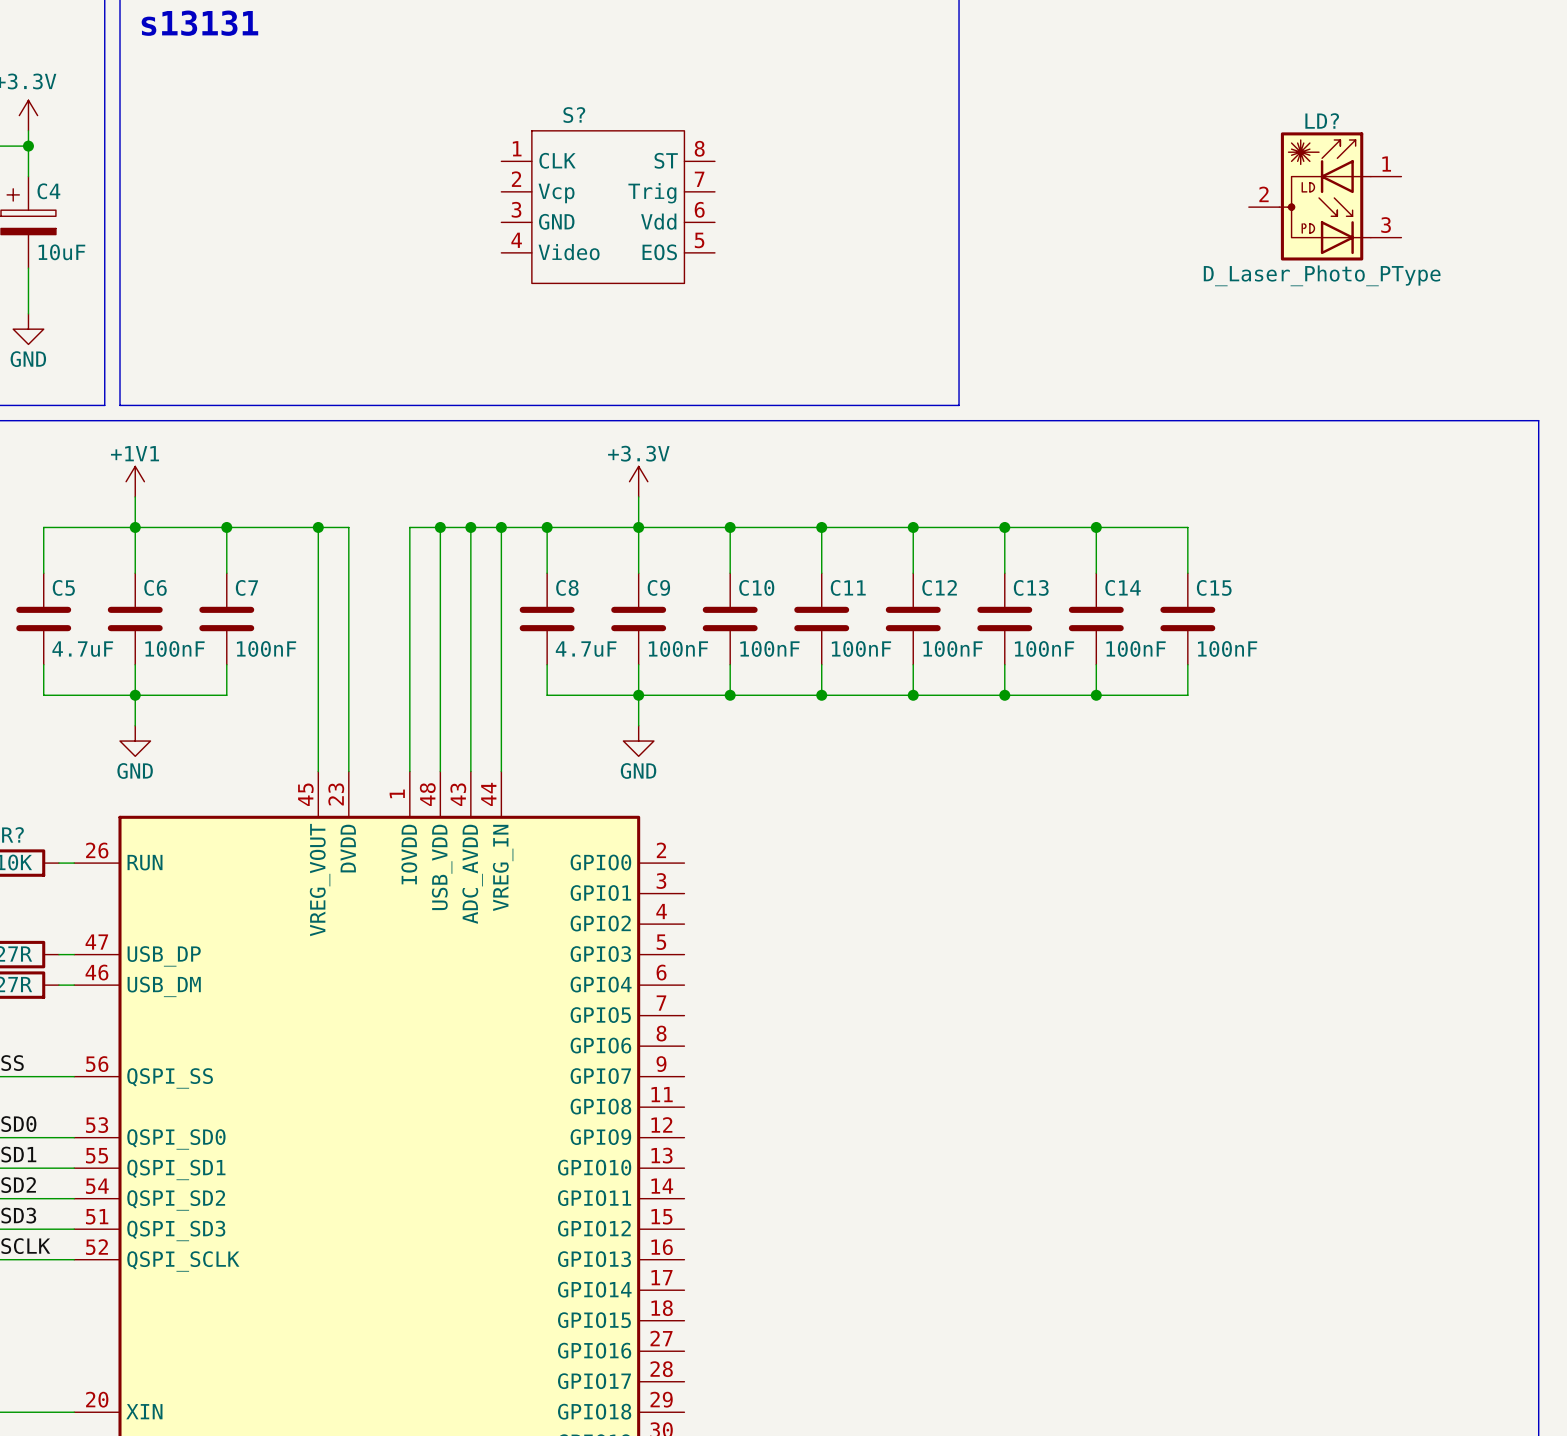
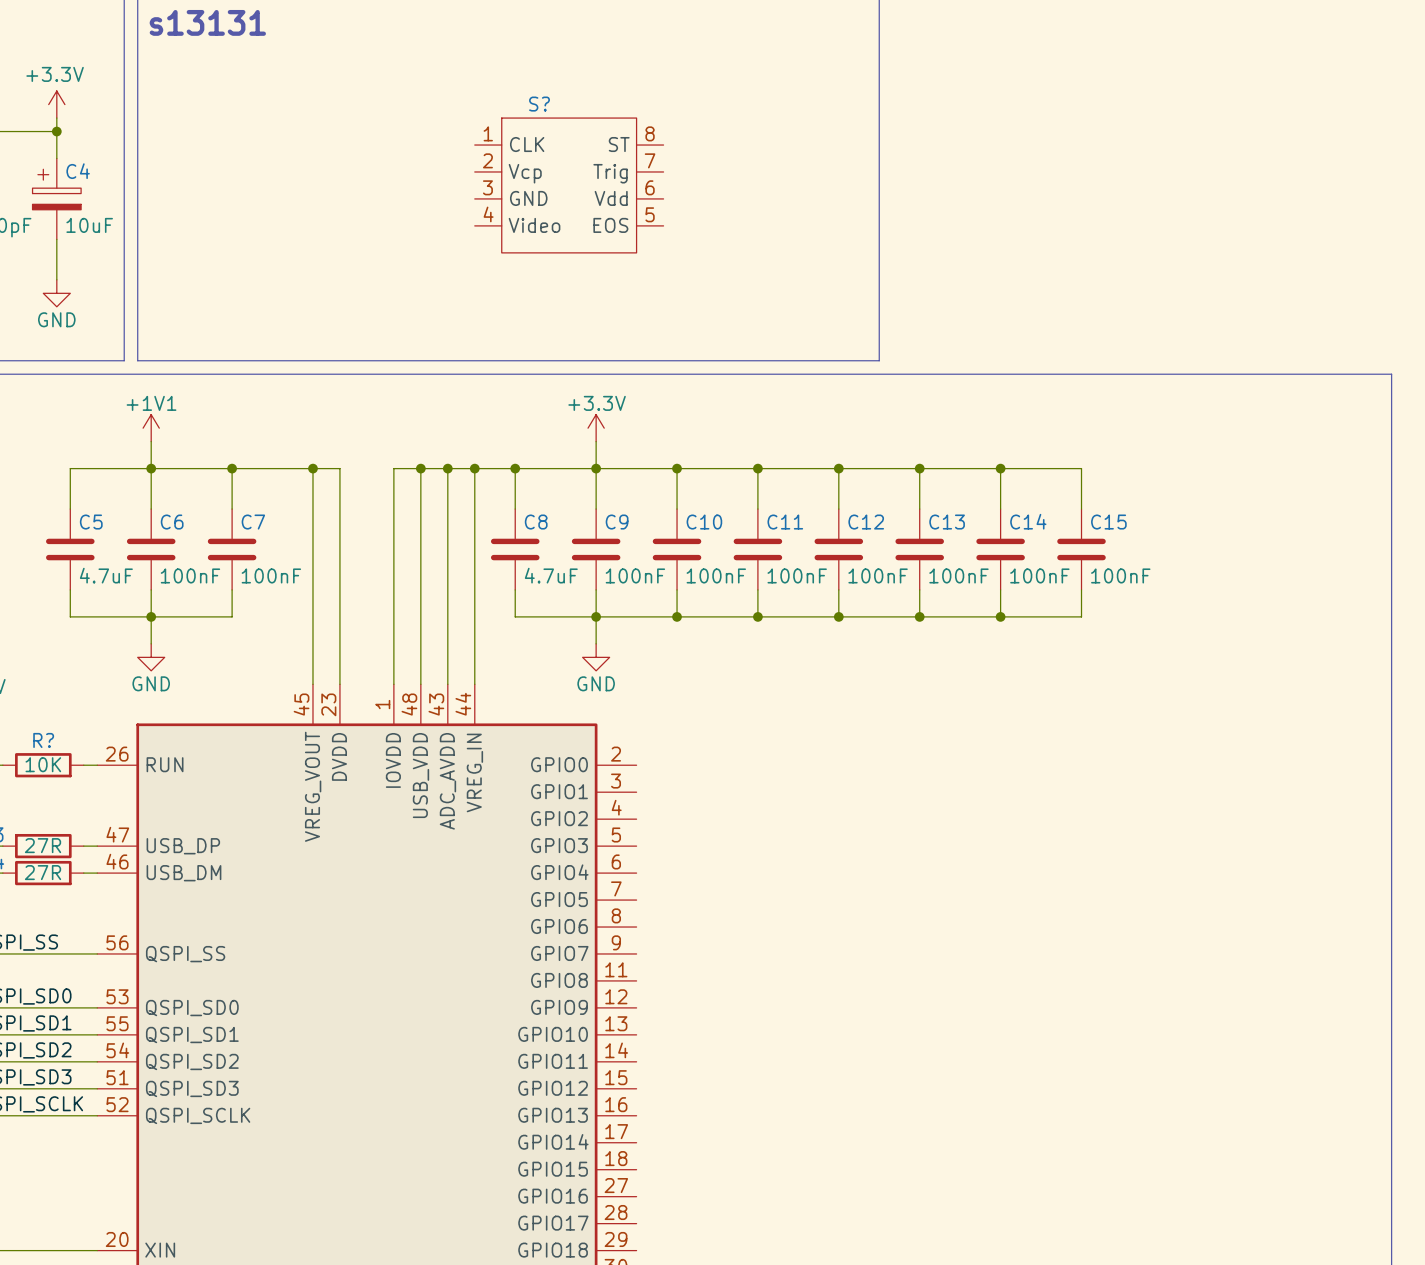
LD?: D_Laser_Photo_PType (1325, 196) -> none

